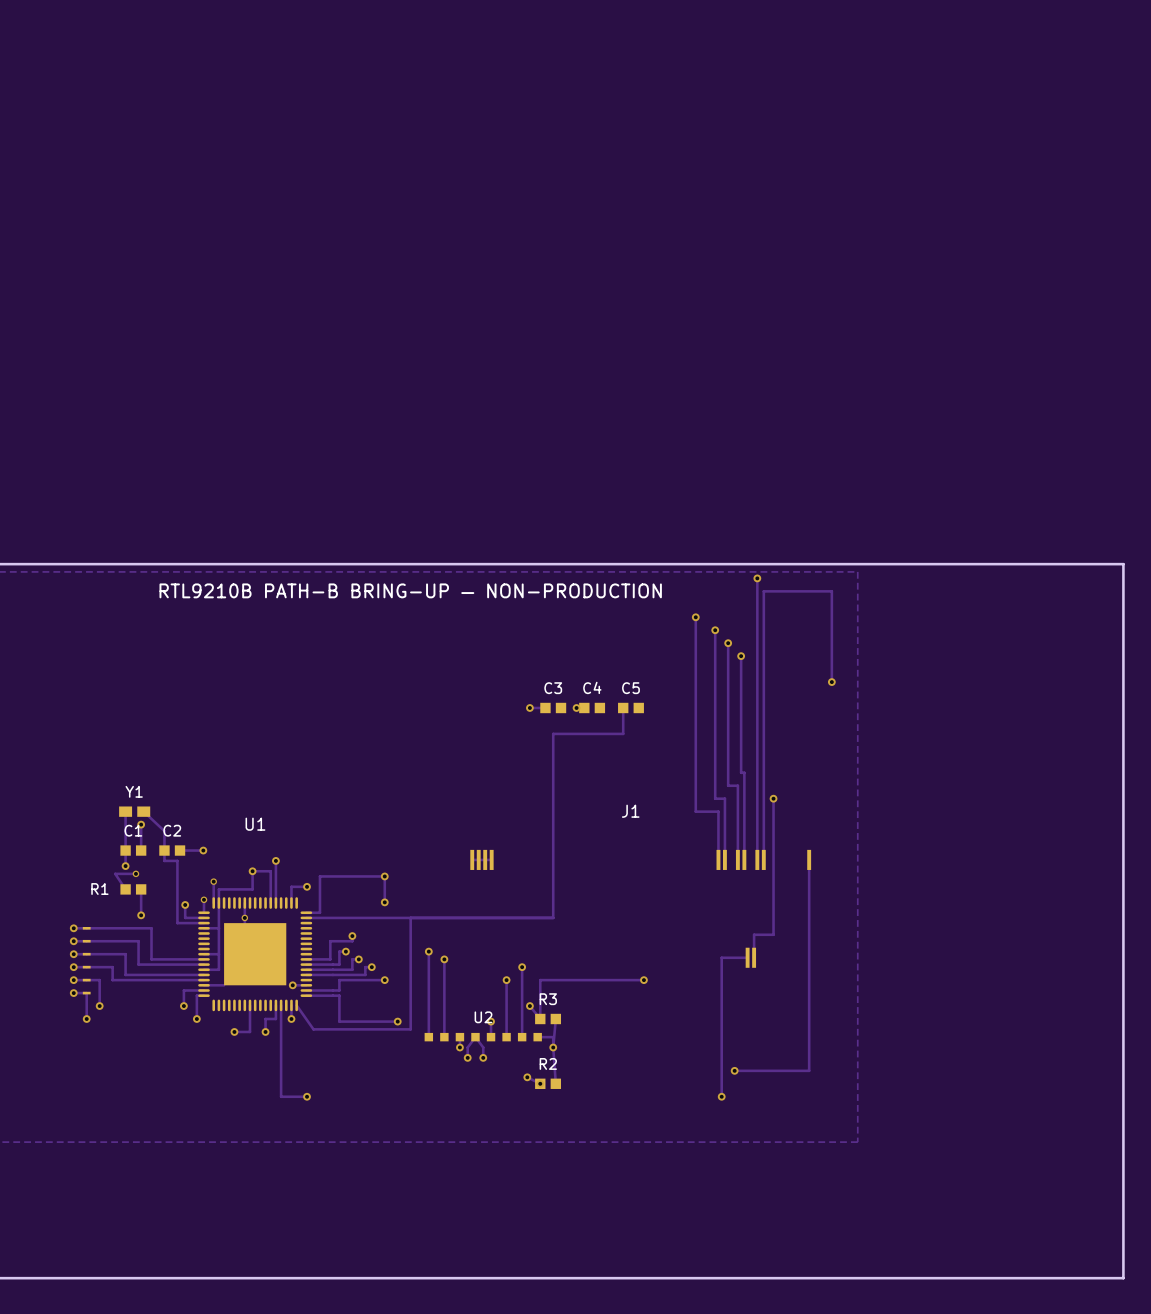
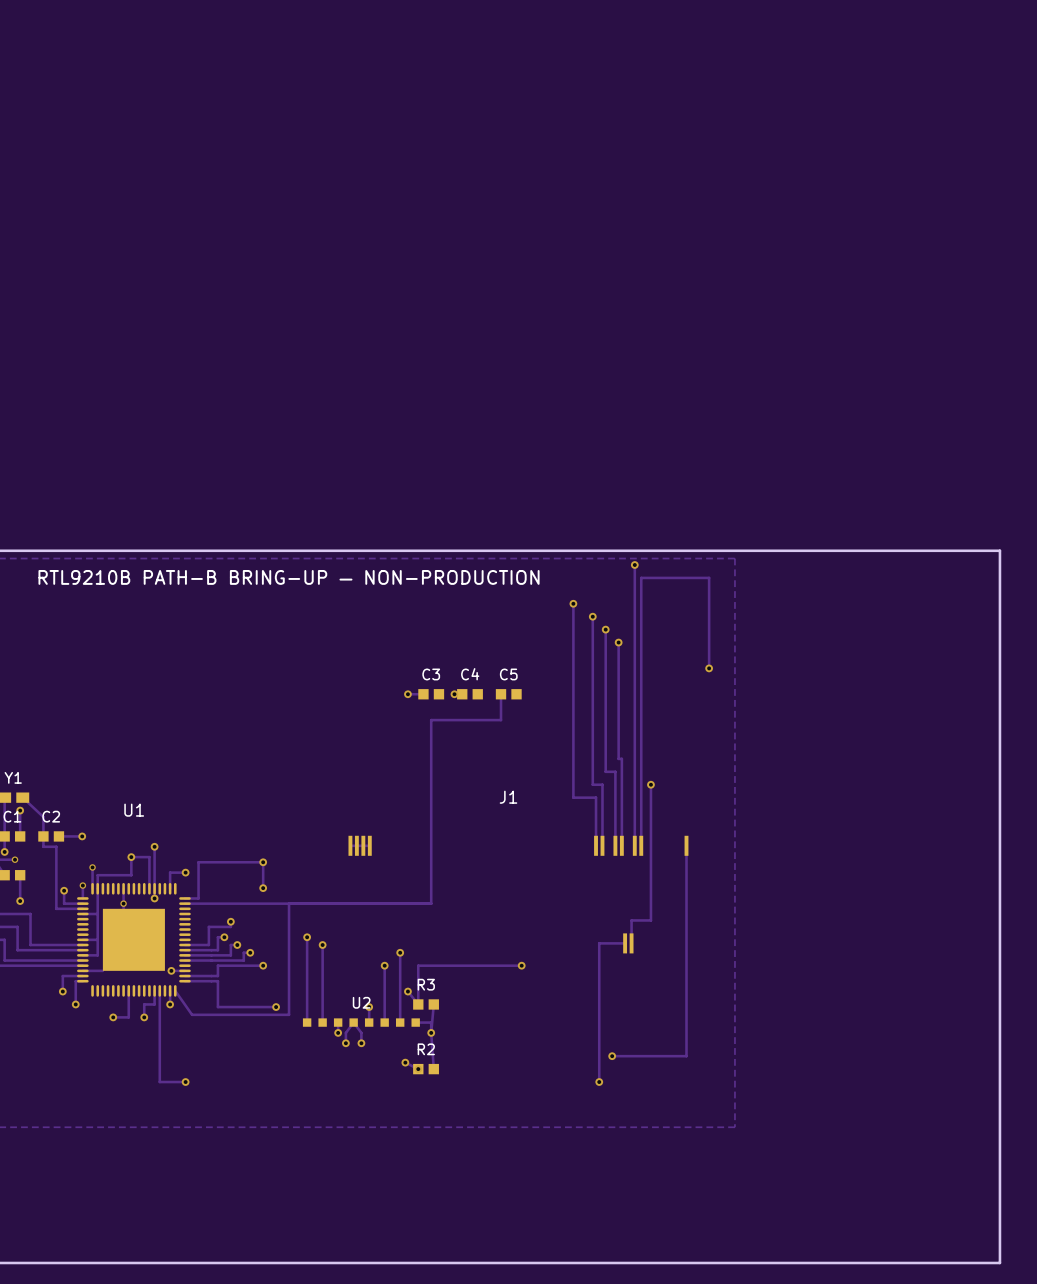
via: none -> (154, 898)

